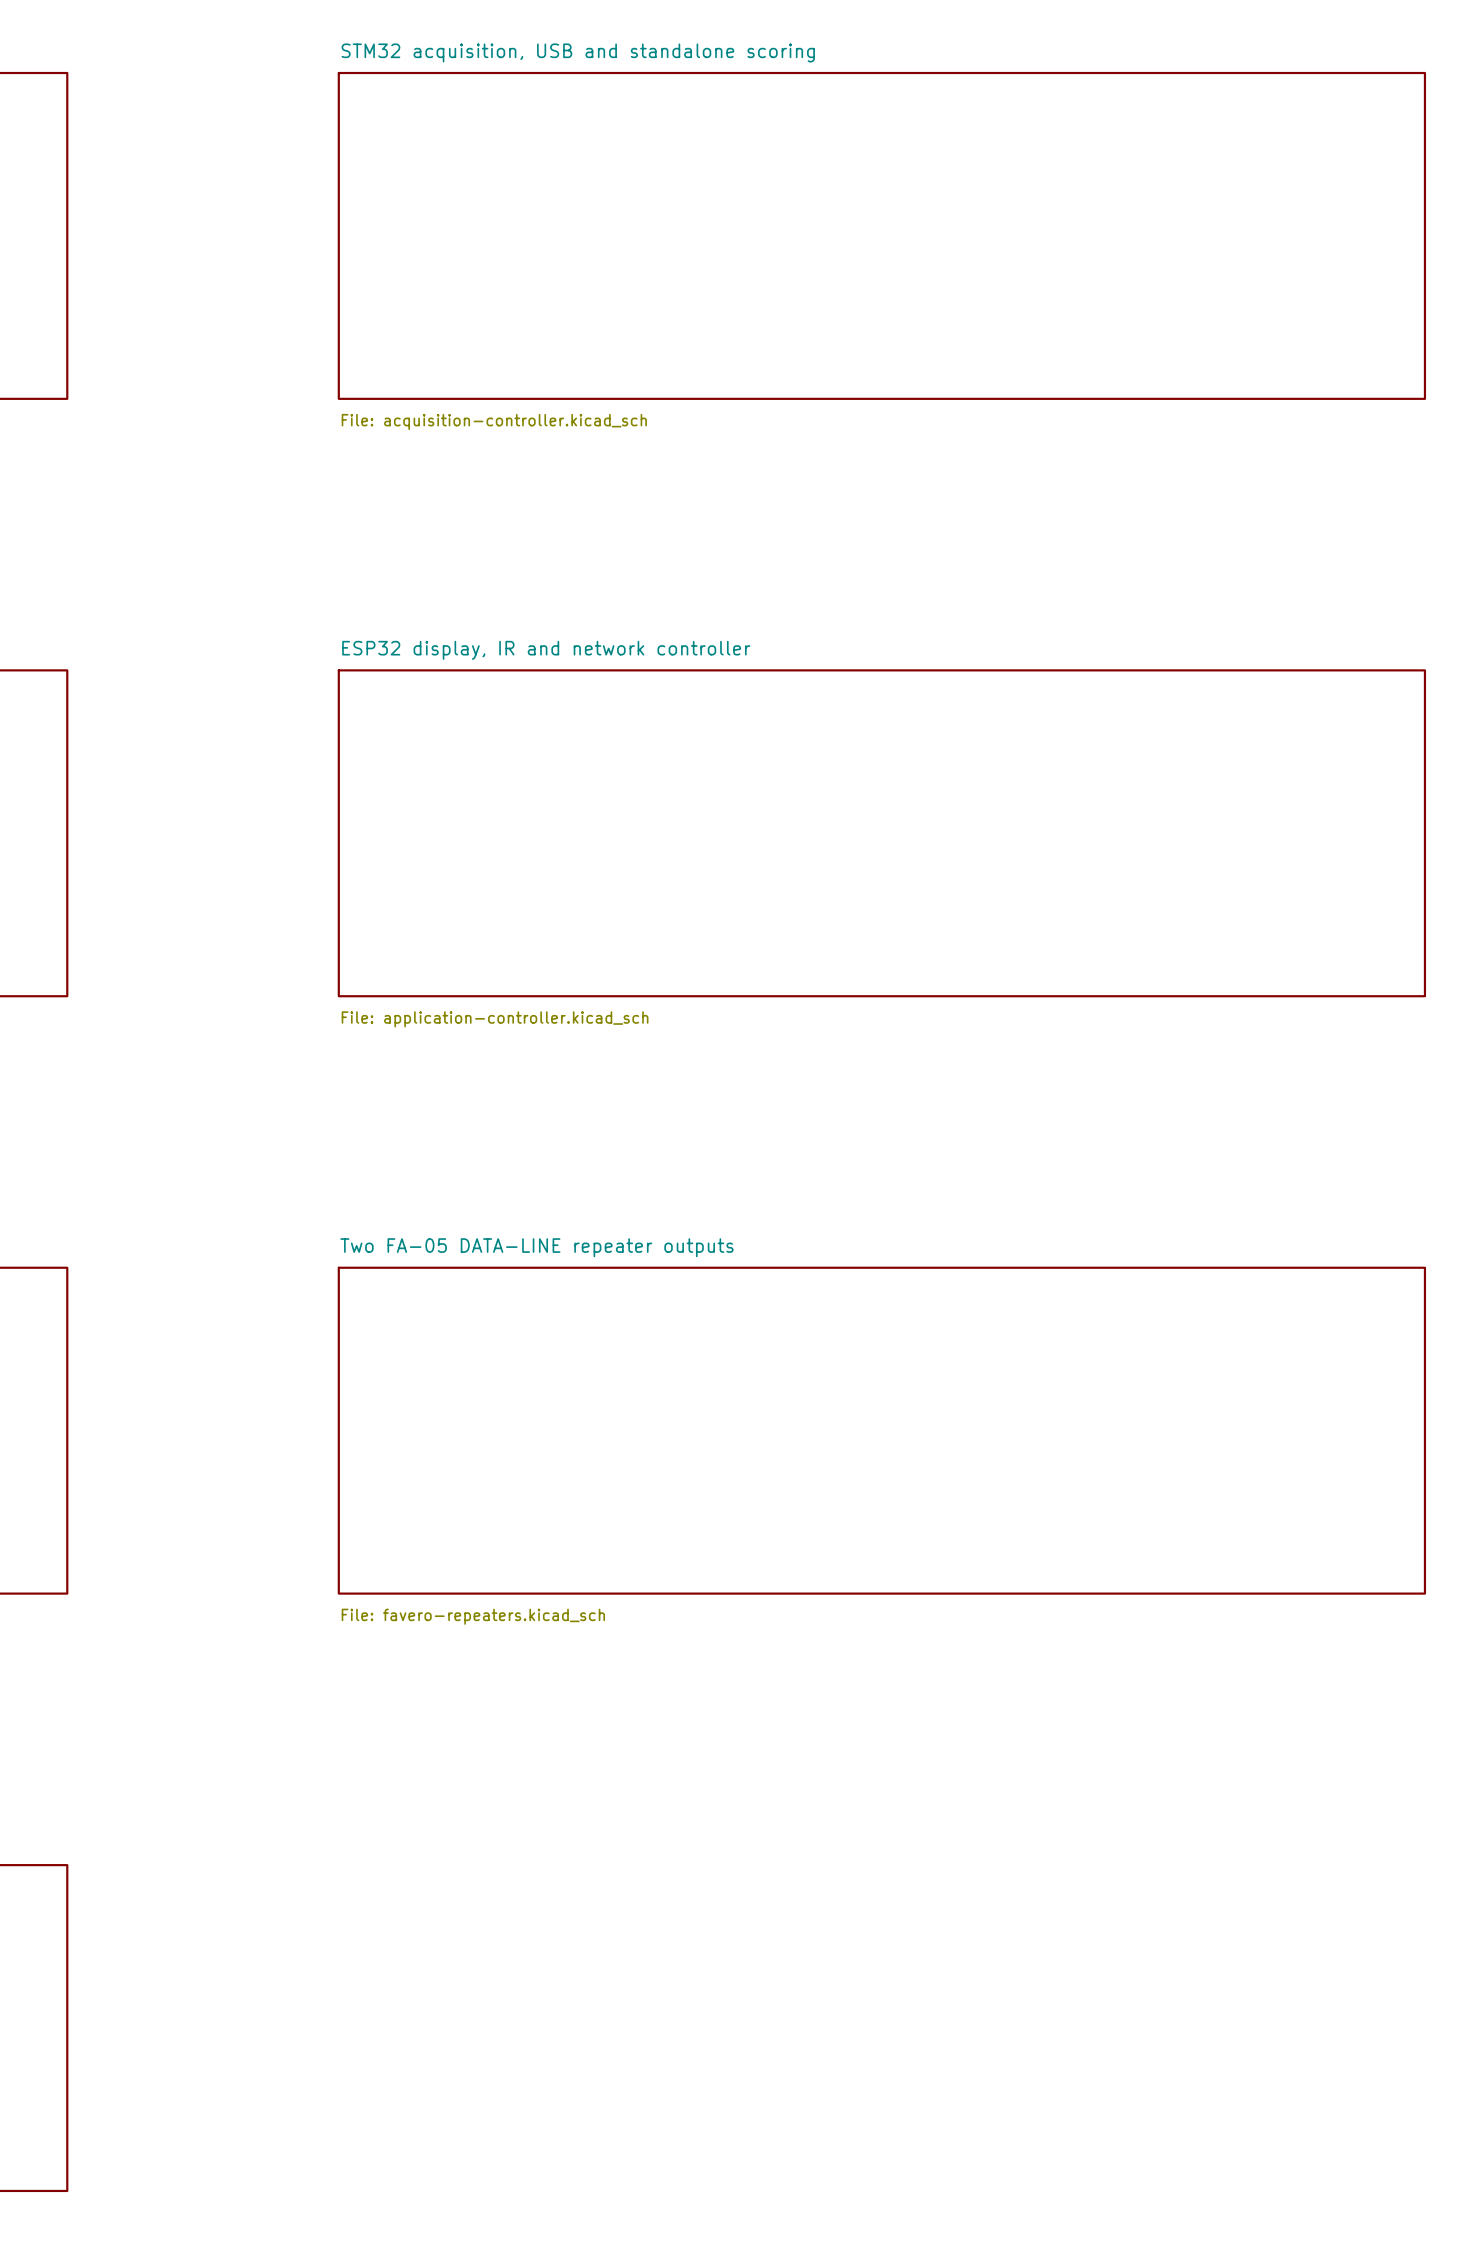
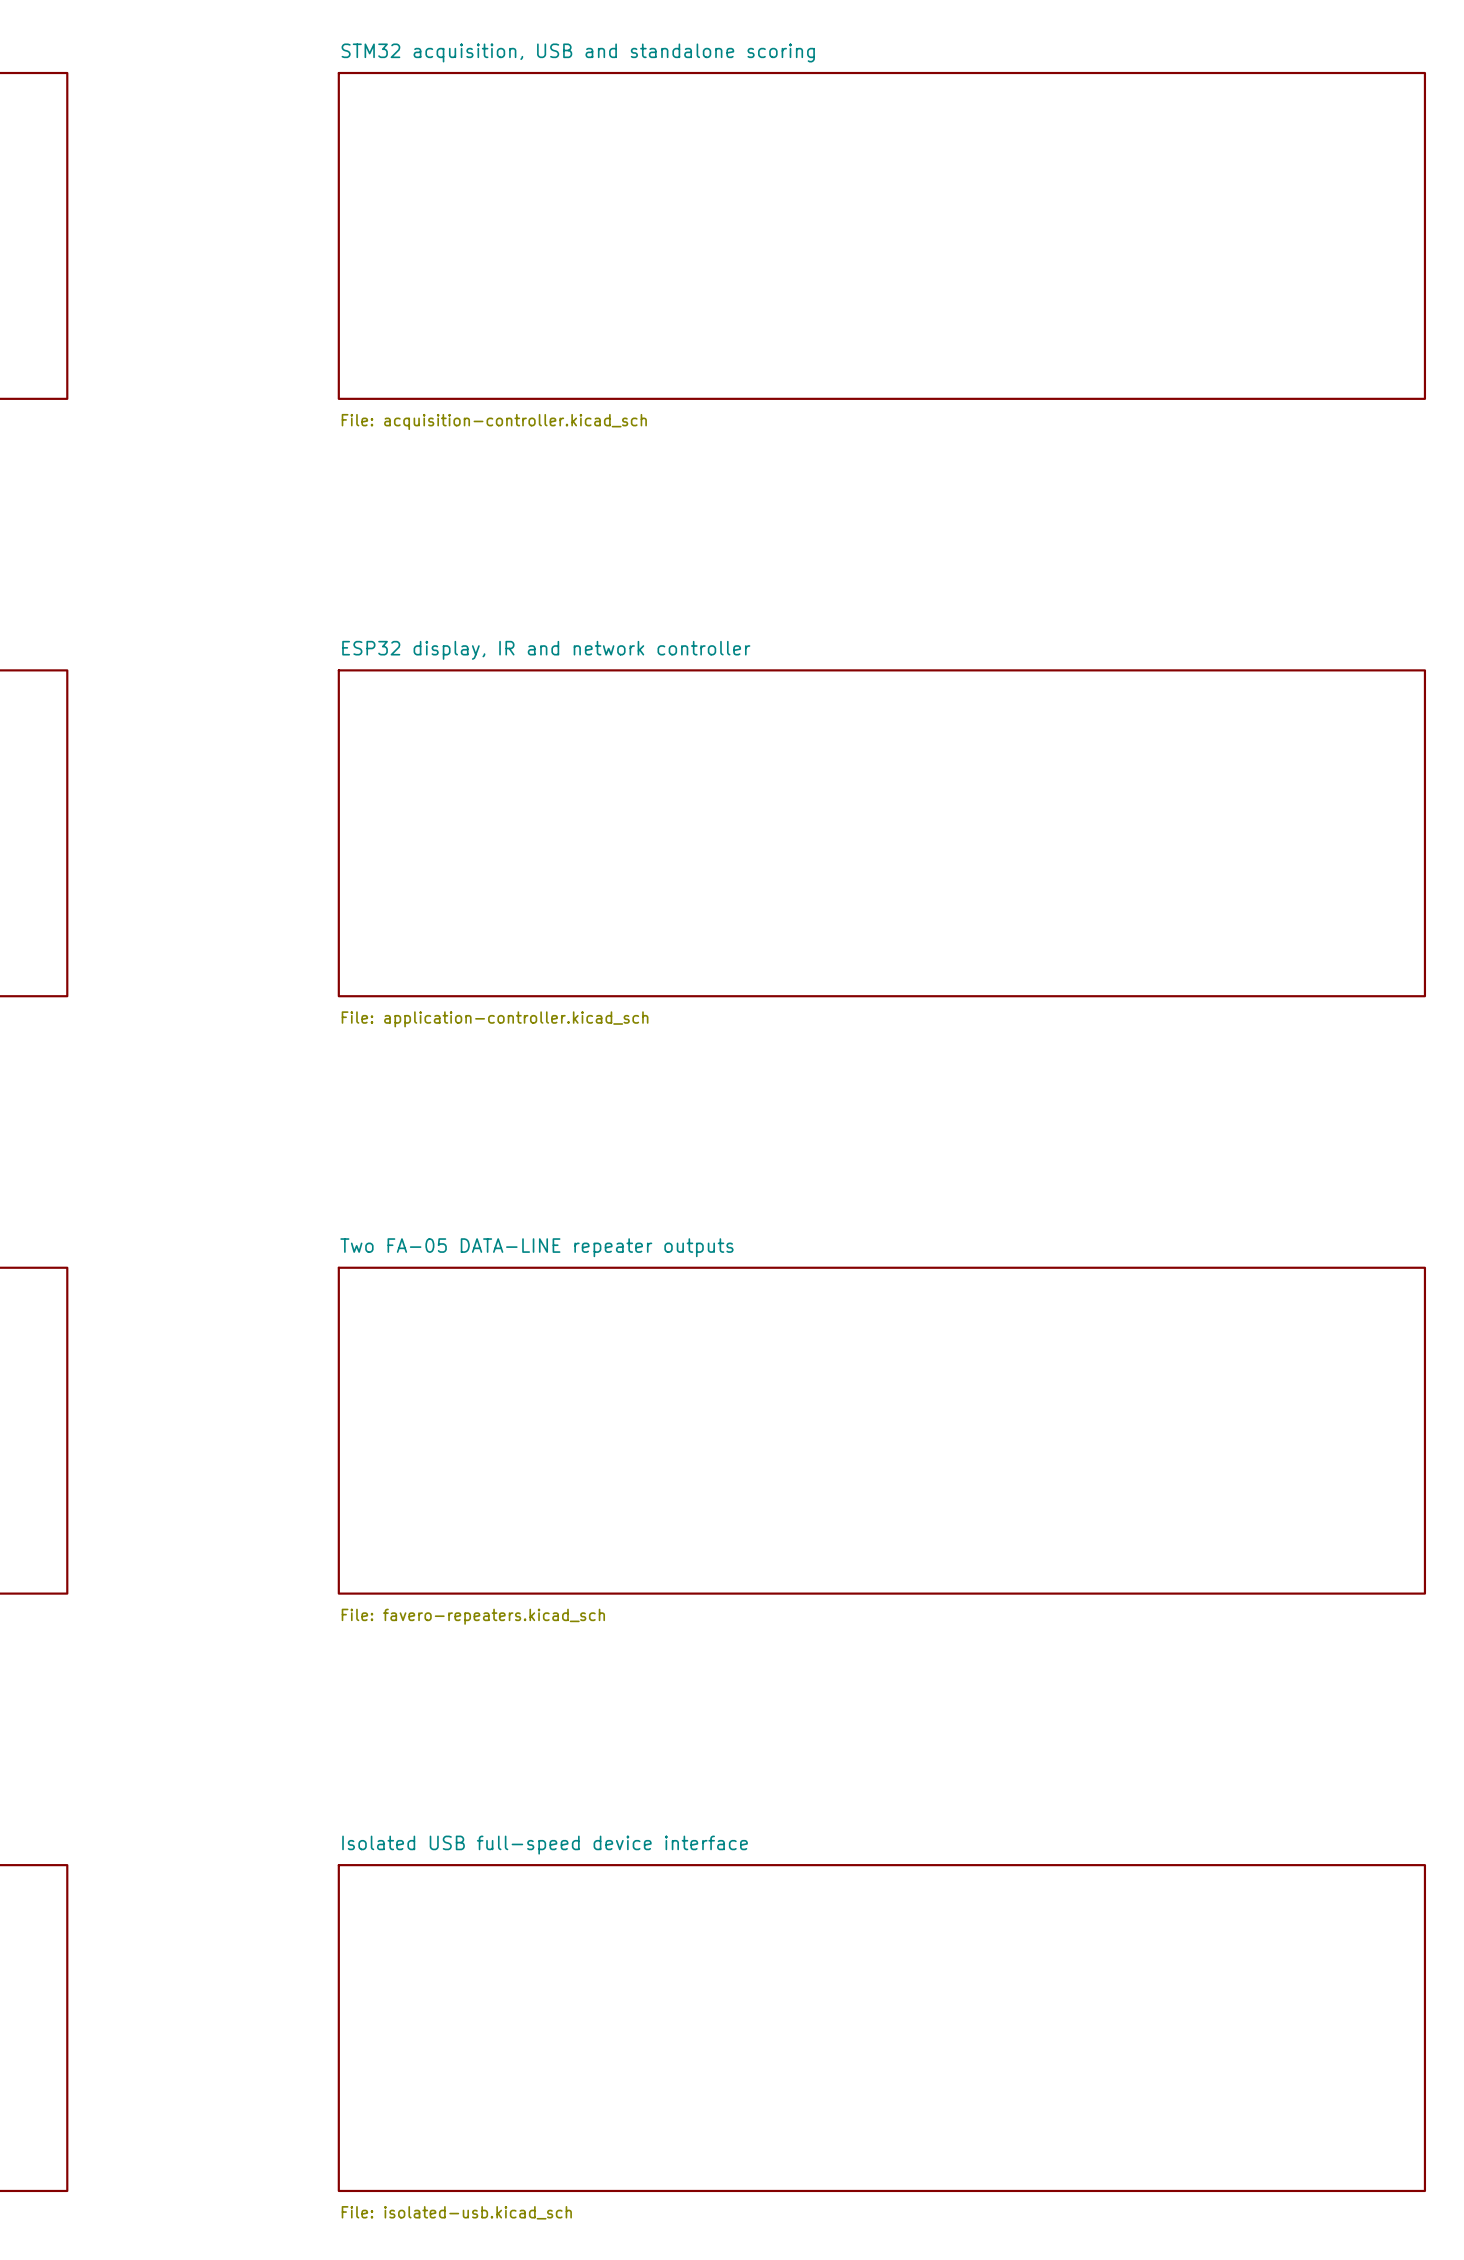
sheet Isolated USB full-speed device interface: none -> File: isolated-usb.kicad_sch (881, 2028)

